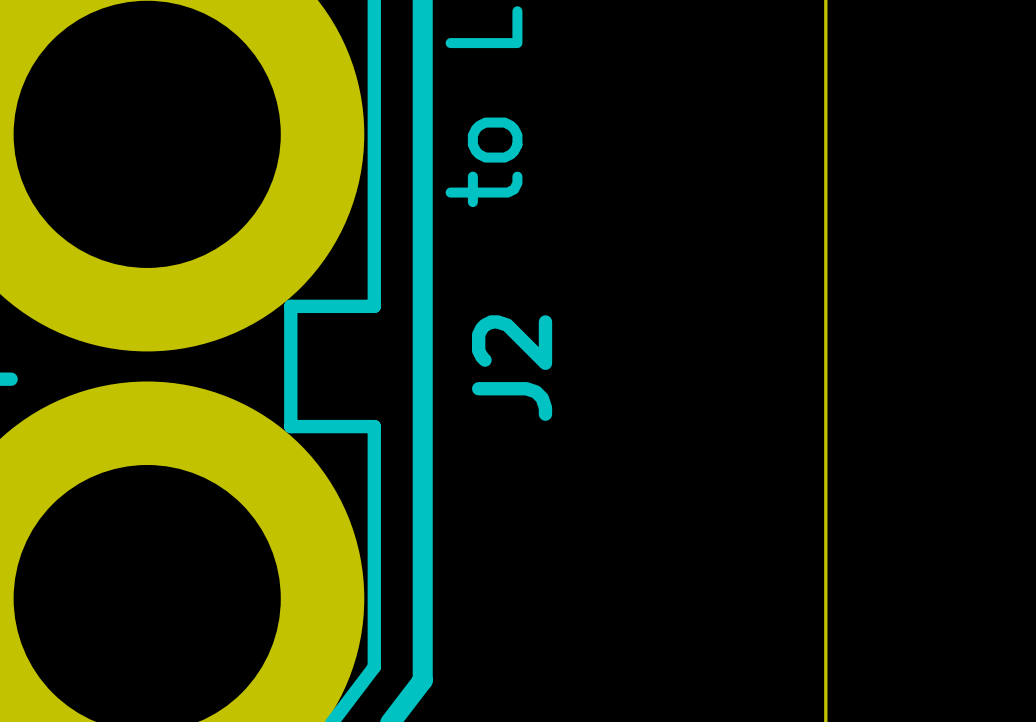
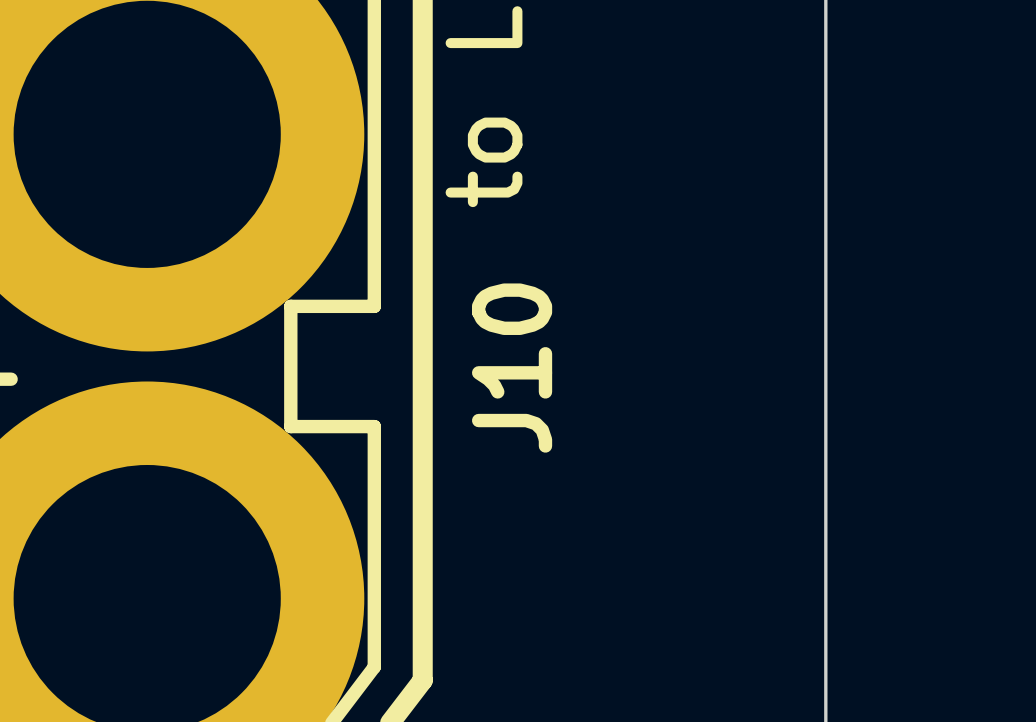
J2 name: J2 (512, 368) -> J10 (512, 368)

